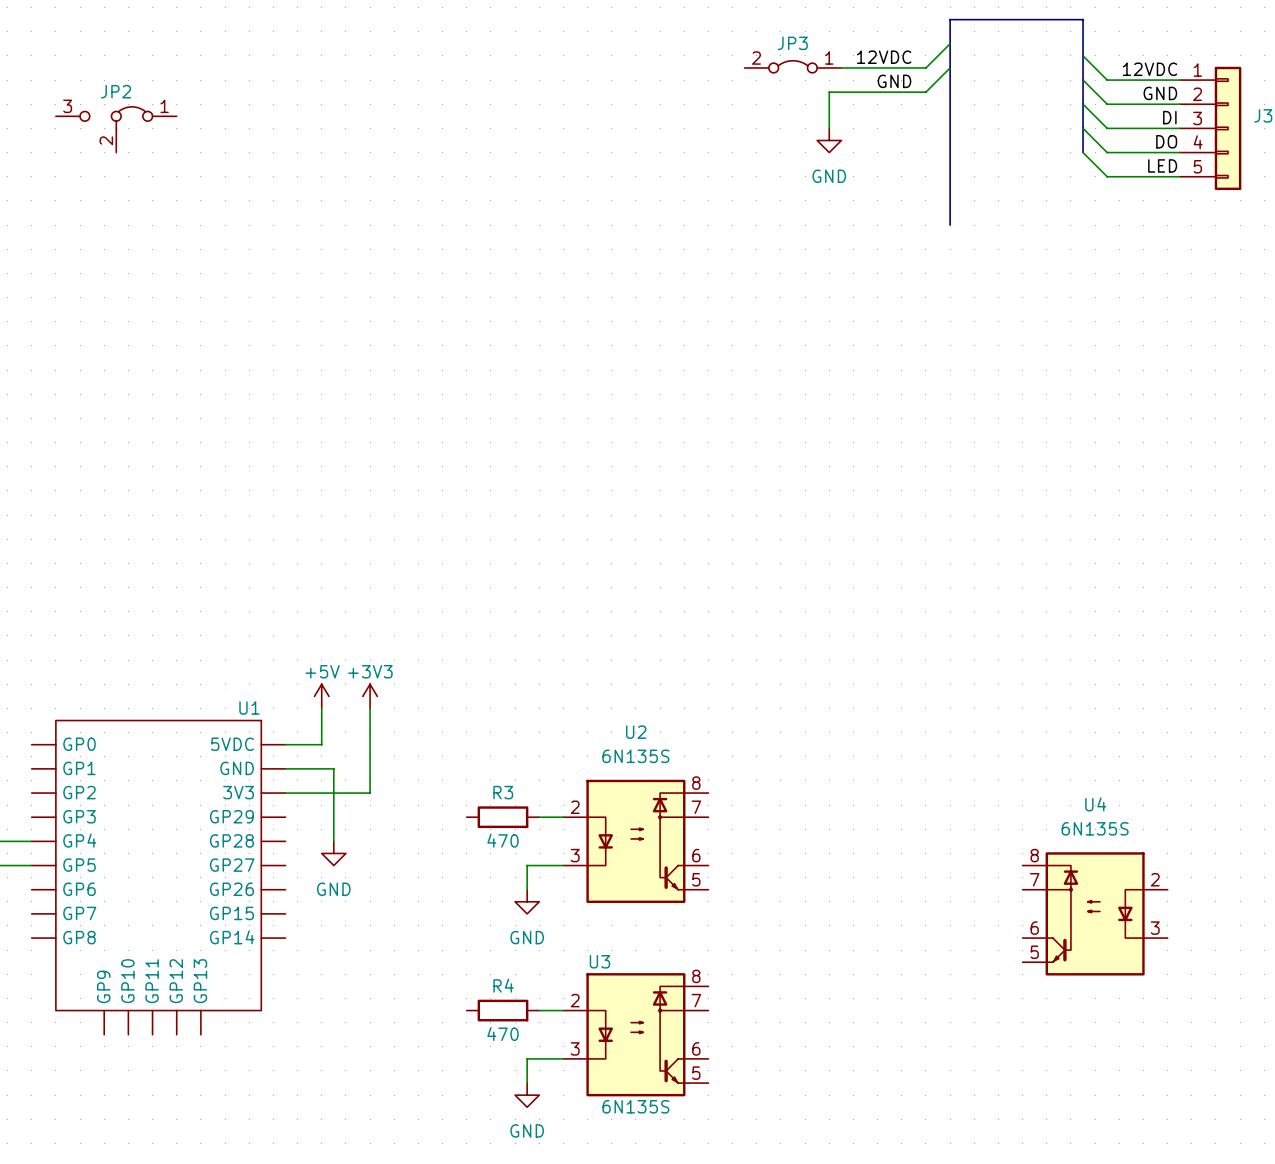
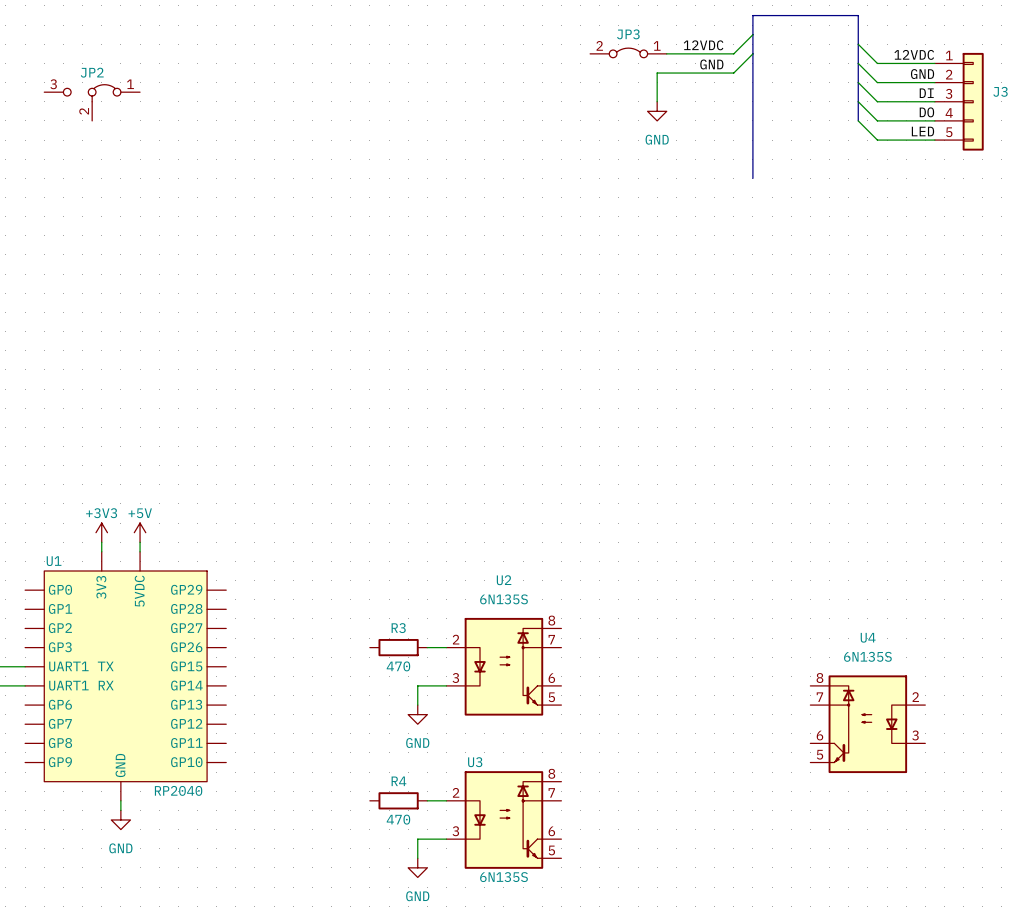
power symbol: none -> +3V3 (101, 532)
wire: none -> (101, 542) (101, 551)
wire: none -> (140, 542) (140, 551)
power symbol position: +5V (321, 696) -> +5V (140, 532)
power symbol: +3V3 (370, 696) -> none
U1 name position: U1 (249, 708) -> U1 (54, 561)
wire: (321, 708) (321, 744) (285, 744) -> none
wire: (370, 708) (370, 793) (285, 793) -> none
U1 symbol: [31, 720, 286, 1035] -> [25, 551, 227, 801]
wire: (285, 768) (333, 768) (333, 841) -> none
power symbol: GND (333, 853) -> none
U1 value: none -> RP2040 (178, 790)
power symbol: none -> GND (120, 819)

